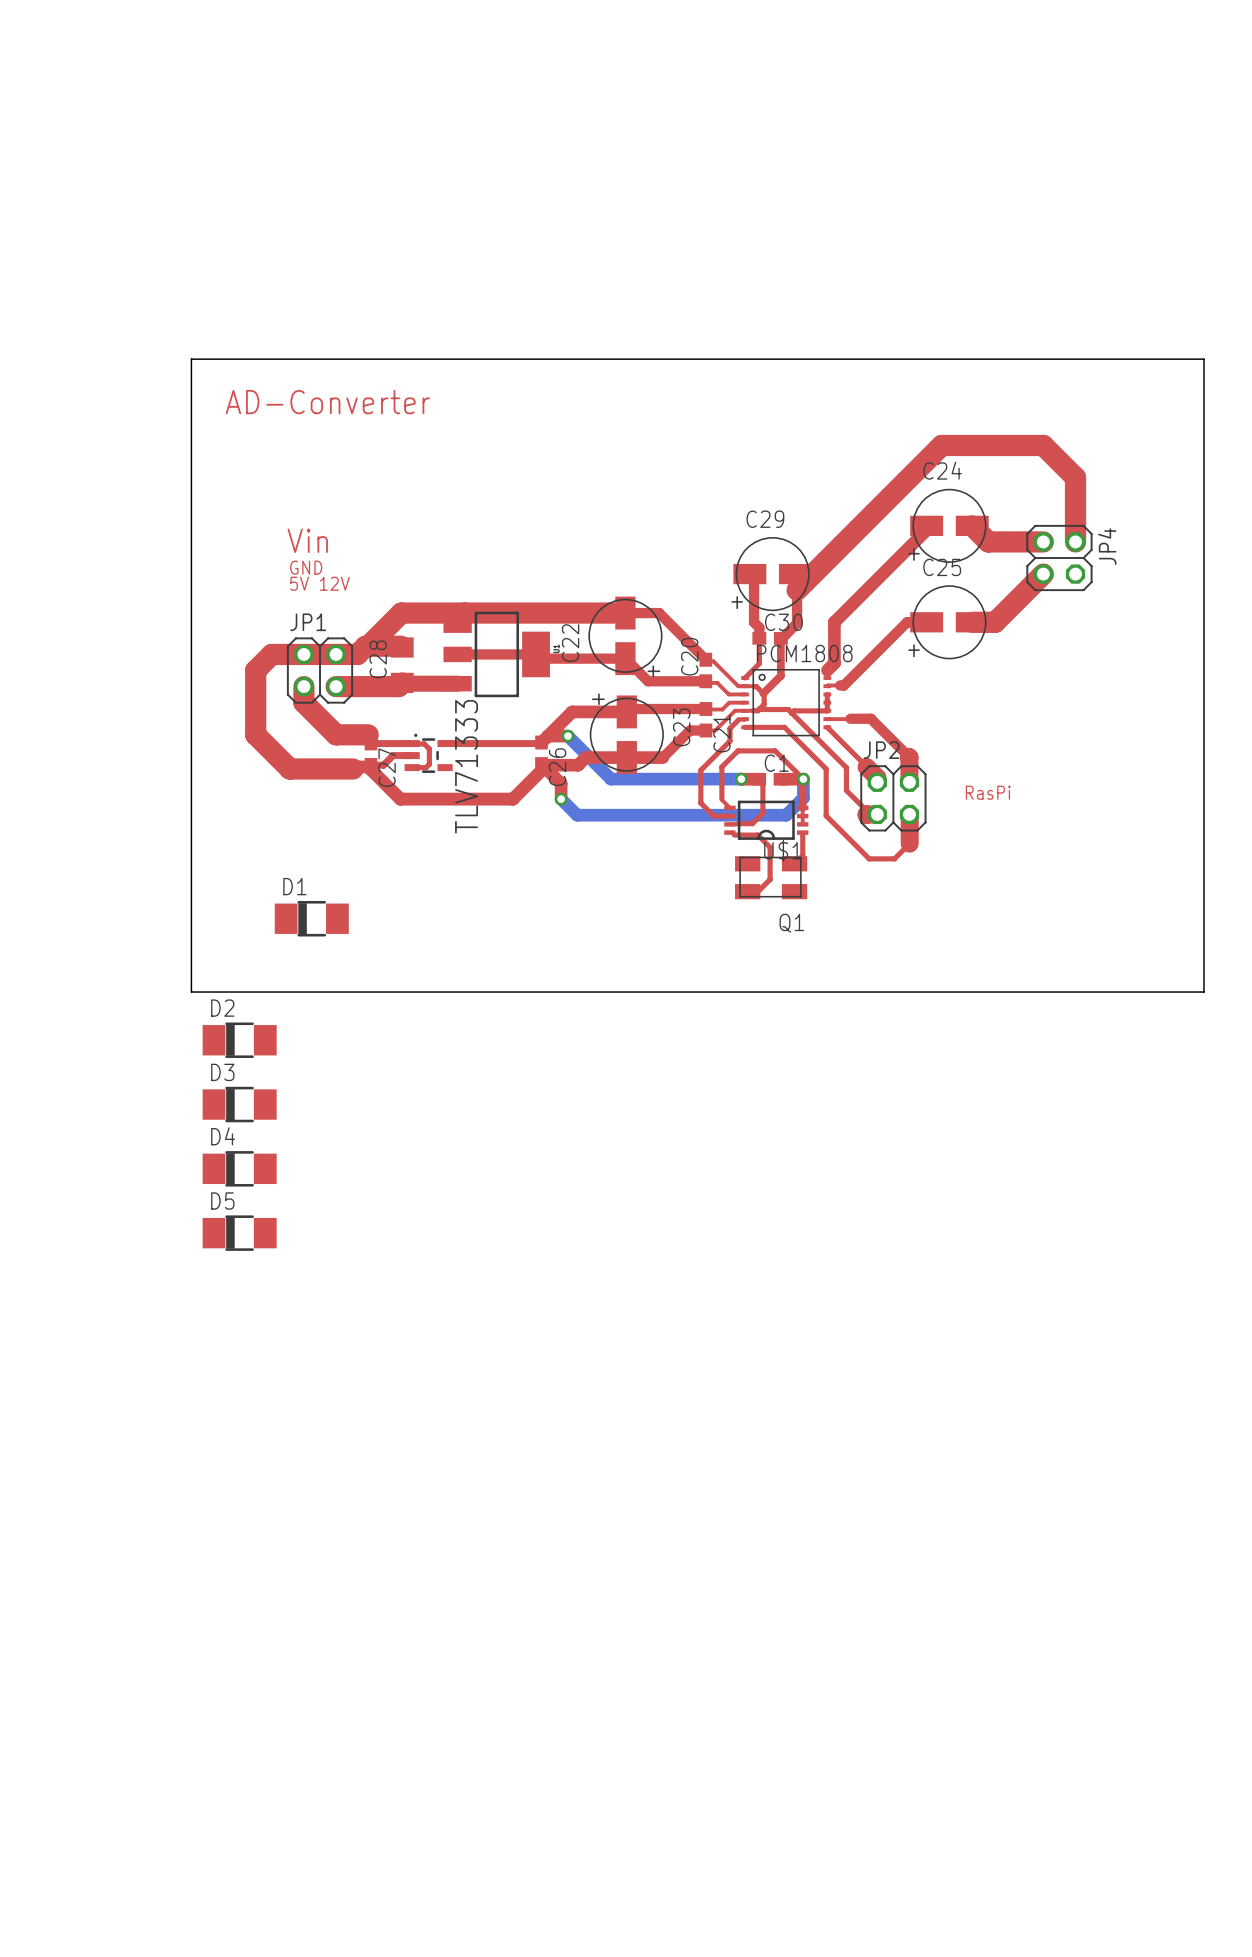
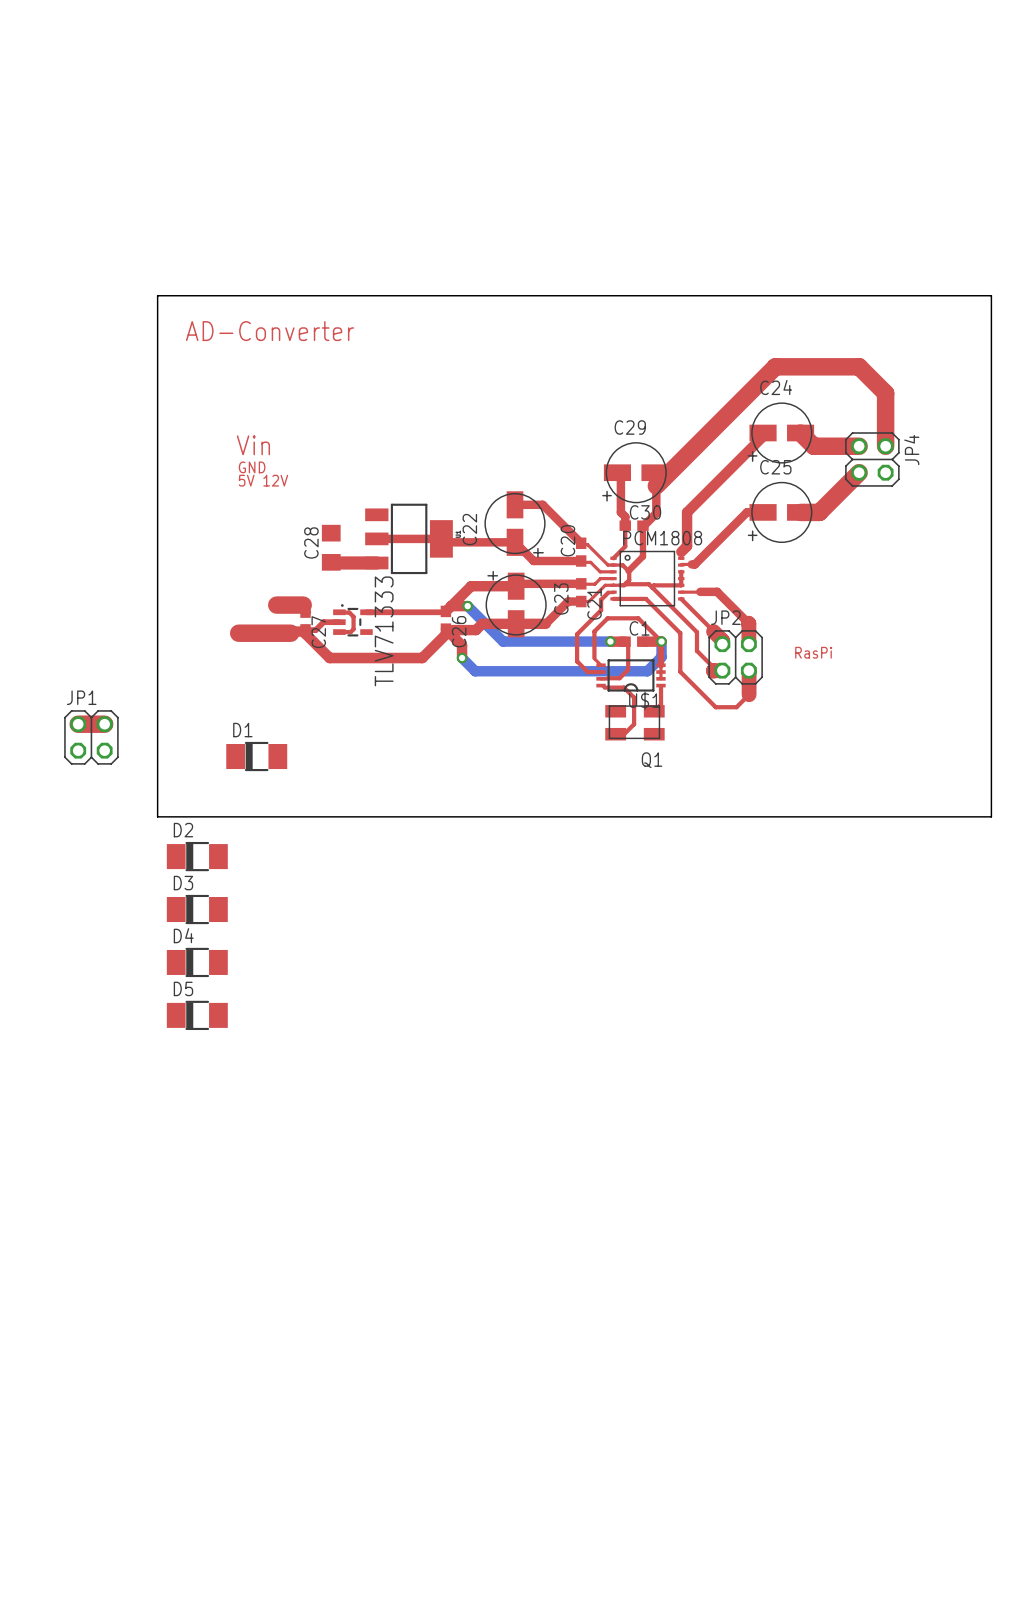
top track: (625, 613) (401, 613) (368, 646) -> none
top track: (401, 646) (365, 646) (357, 654) (271, 654) (255, 670) (255, 734) (289, 768) -> none
JP1 position: (320, 670) -> (91, 737)
top track: (402, 682) (398, 686) (336, 686) -> none
top track: (303, 686) (303, 702) (336, 734) -> none
top track: (374, 743) (412, 743) -> none
top track: none -> (78, 724) (104, 724)

